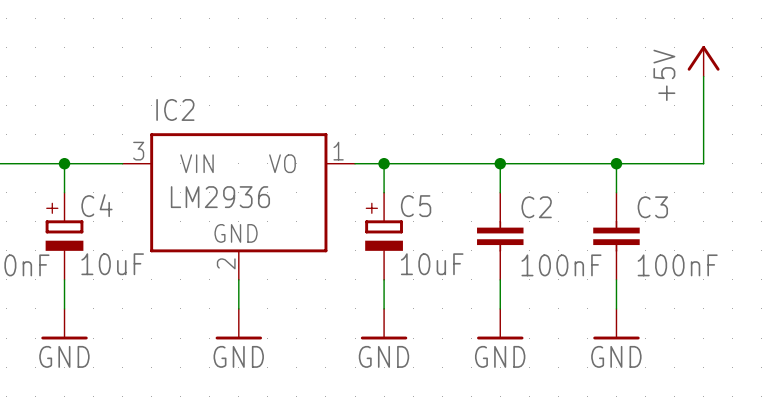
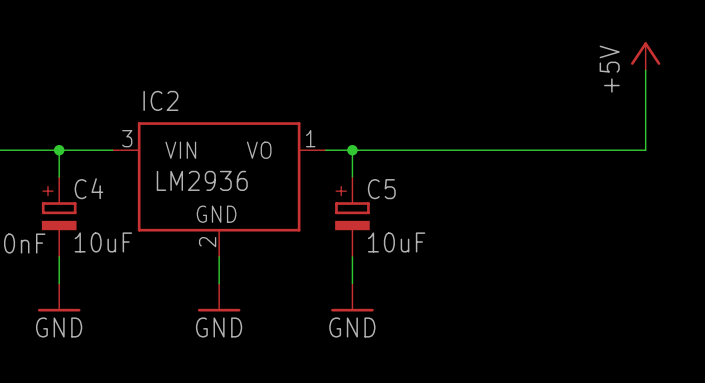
wire: (500, 163) (500, 192) -> none
junction: (500, 163) -> none
wire: (616, 163) (616, 192) -> none
junction: (616, 163) -> none
C2: 100nF (500, 236) -> none
C3: 100nF (616, 236) -> none
wire: (500, 279) (500, 308) -> none
wire: (616, 279) (616, 308) -> none
power symbol: GND (500, 324) -> none
power symbol: GND (616, 324) -> none

